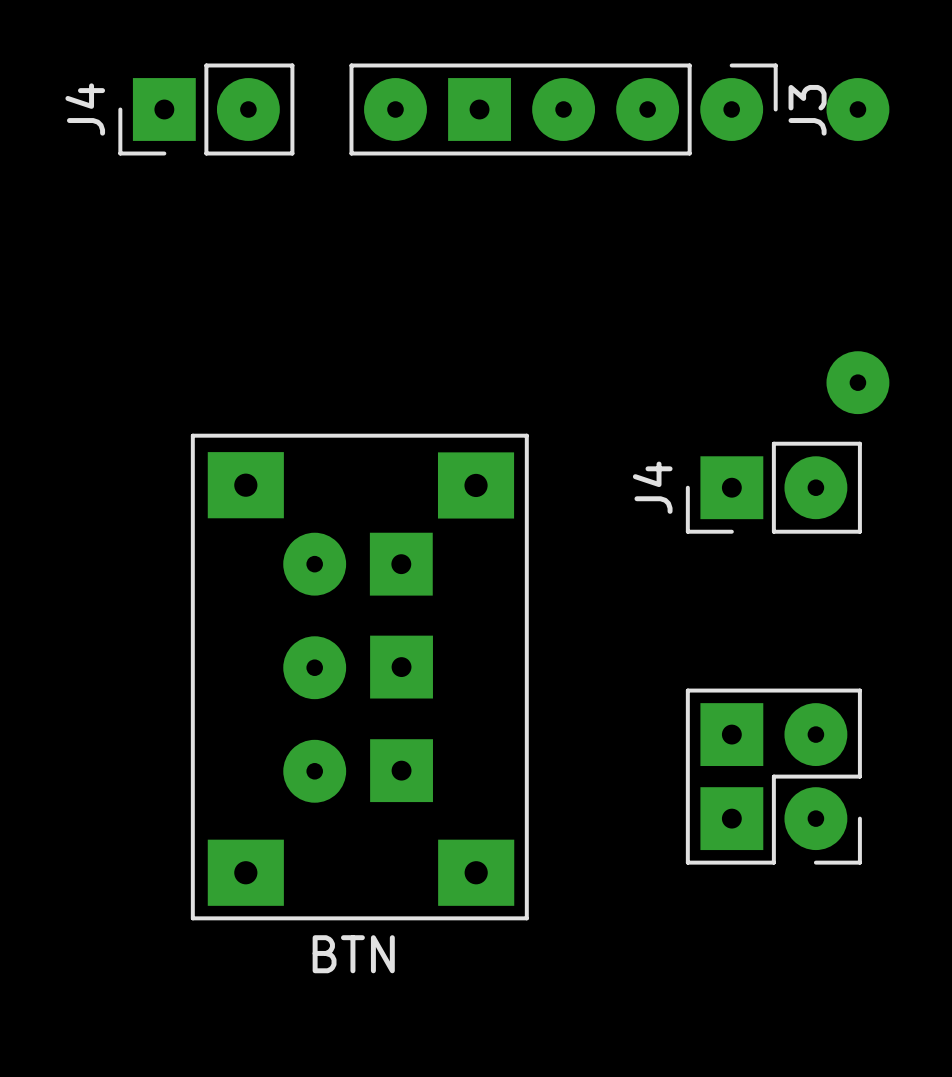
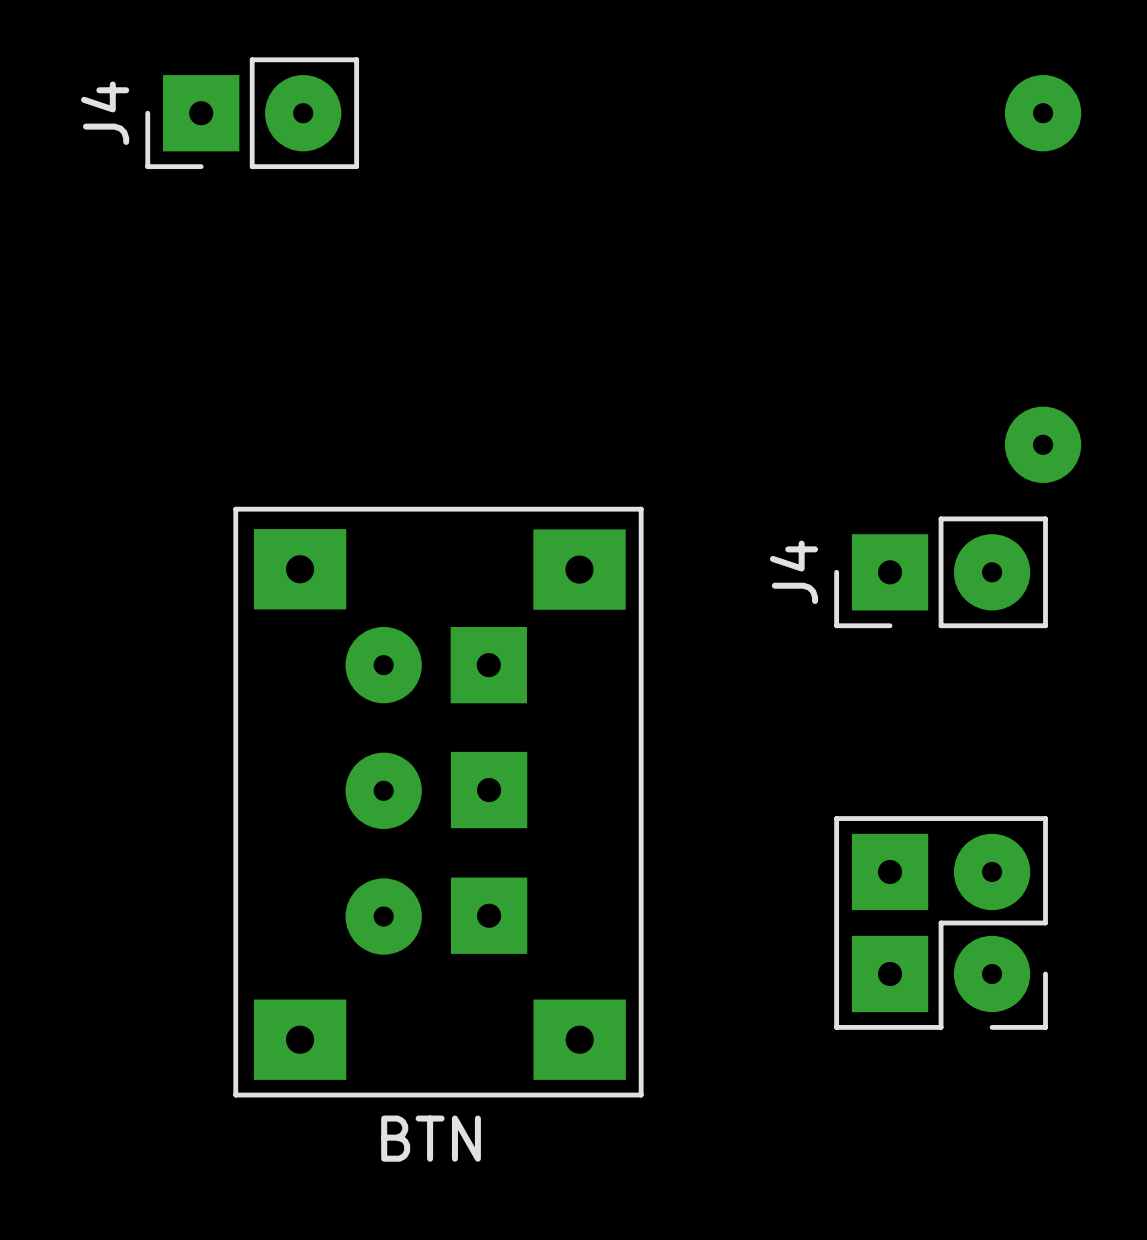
J3: (563, 109) -> none

